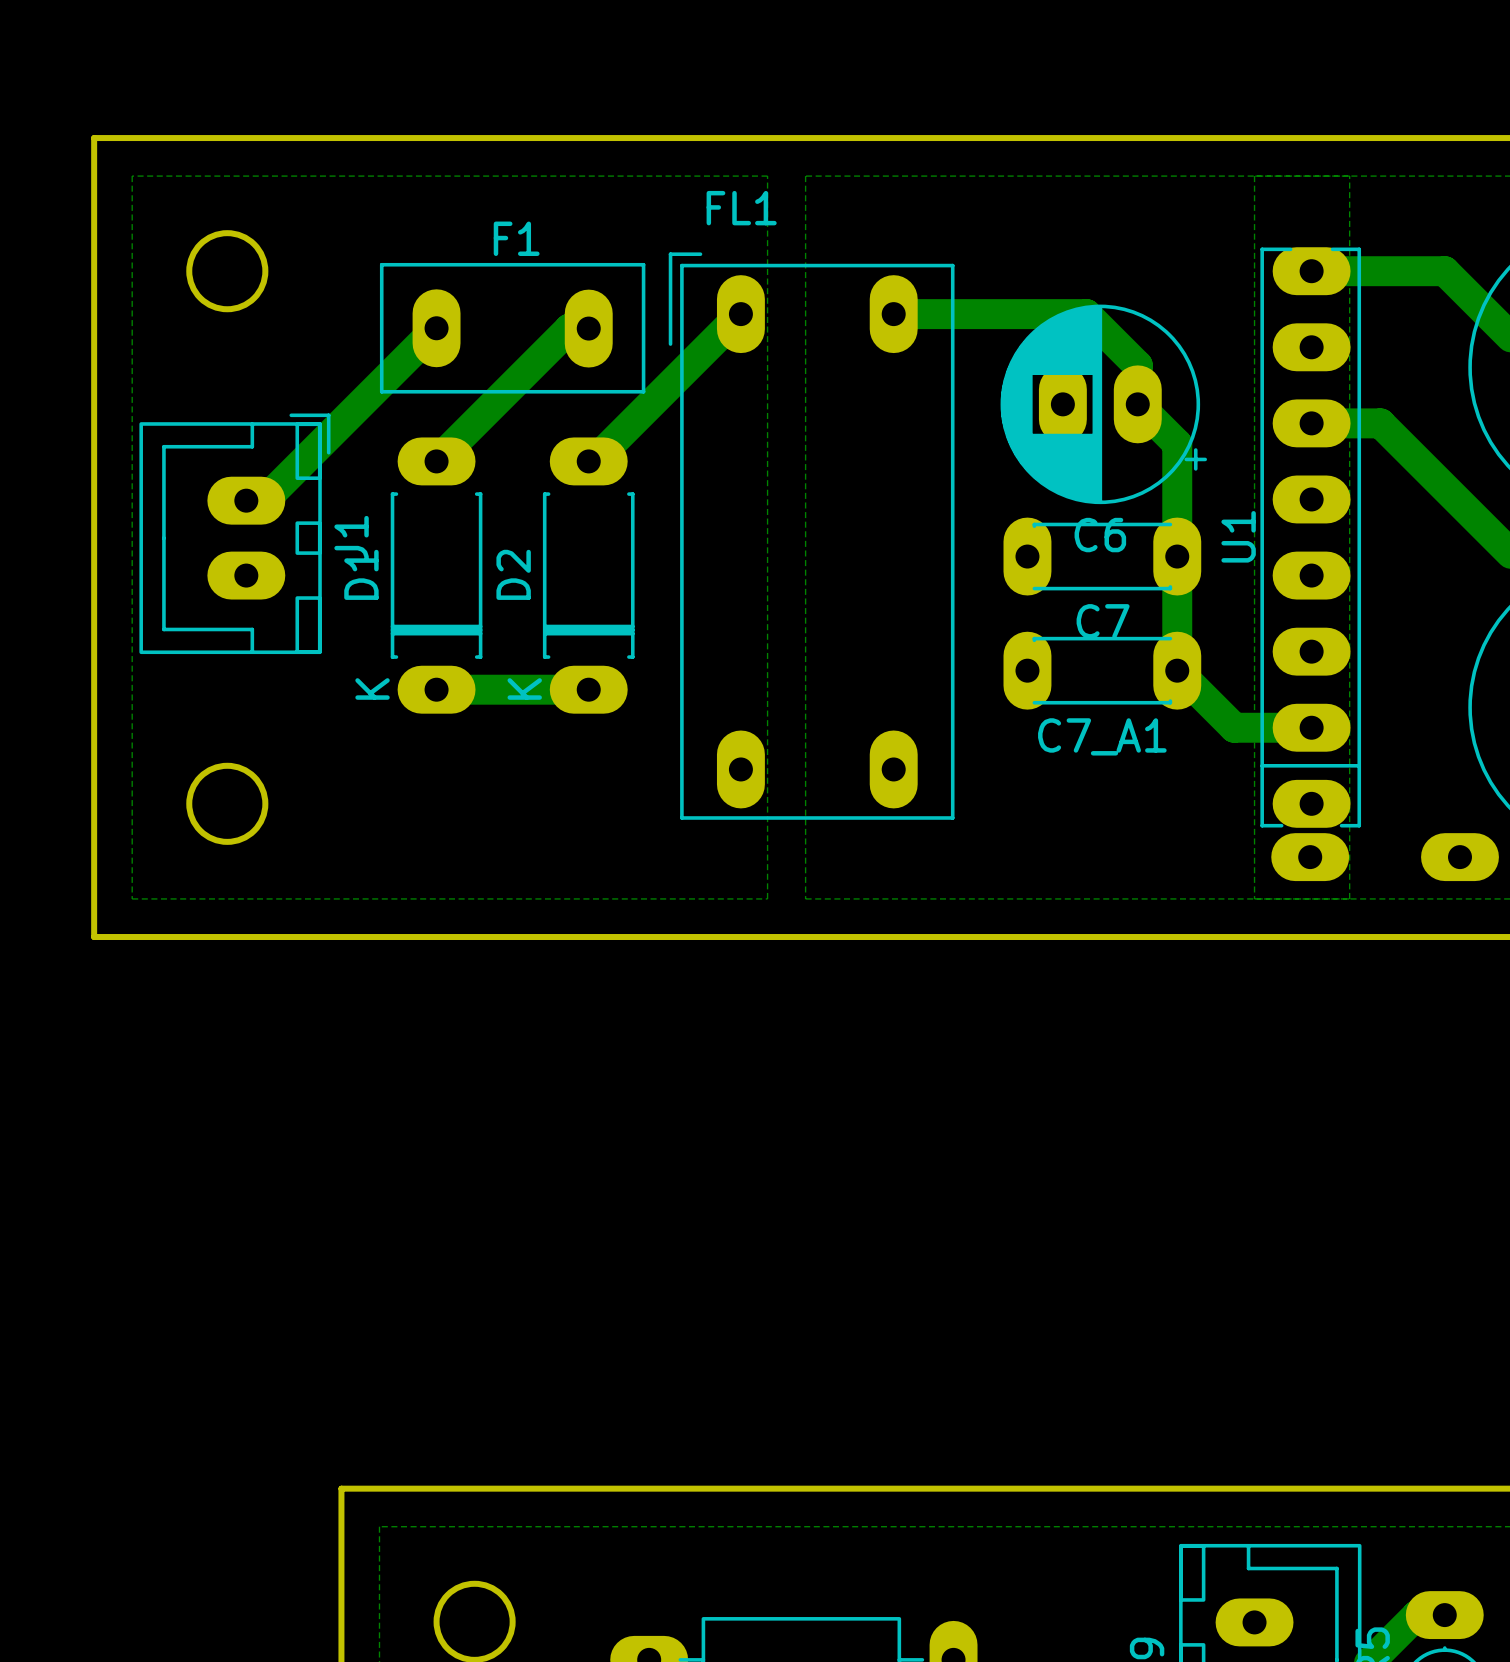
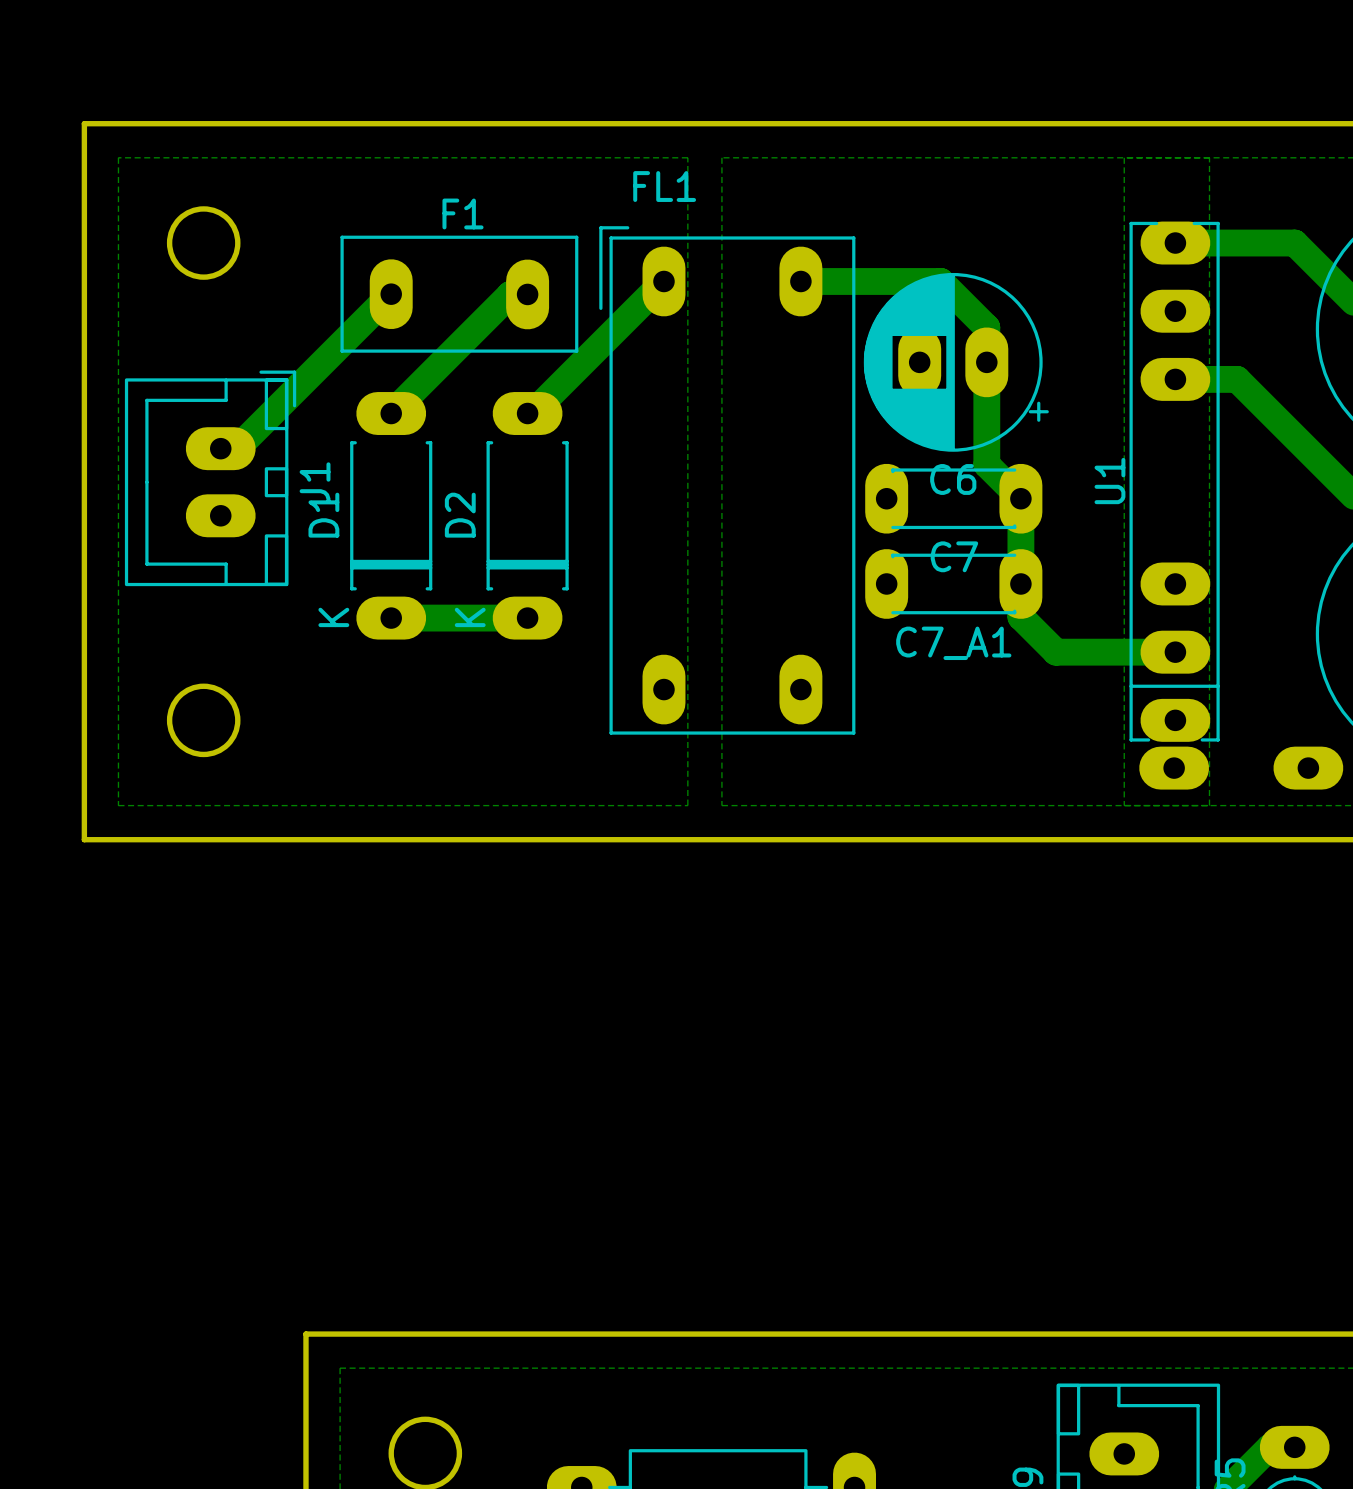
U1 footprint: [1260, 247, 1362, 828] -> [1129, 221, 1220, 742]
bottom track: (1049, 314) (1086, 314) (1137, 365) (1137, 404) (1177, 443) (1177, 670) (1234, 727) -> (940, 281) (986, 327) (986, 464) (1020, 498) (1020, 617) (1056, 652) (1106, 652)
C6 position: (1103, 404) -> (956, 362)
C7 position: (1102, 556) -> (953, 498)
C7_A1 position: (1102, 670) -> (953, 583)

